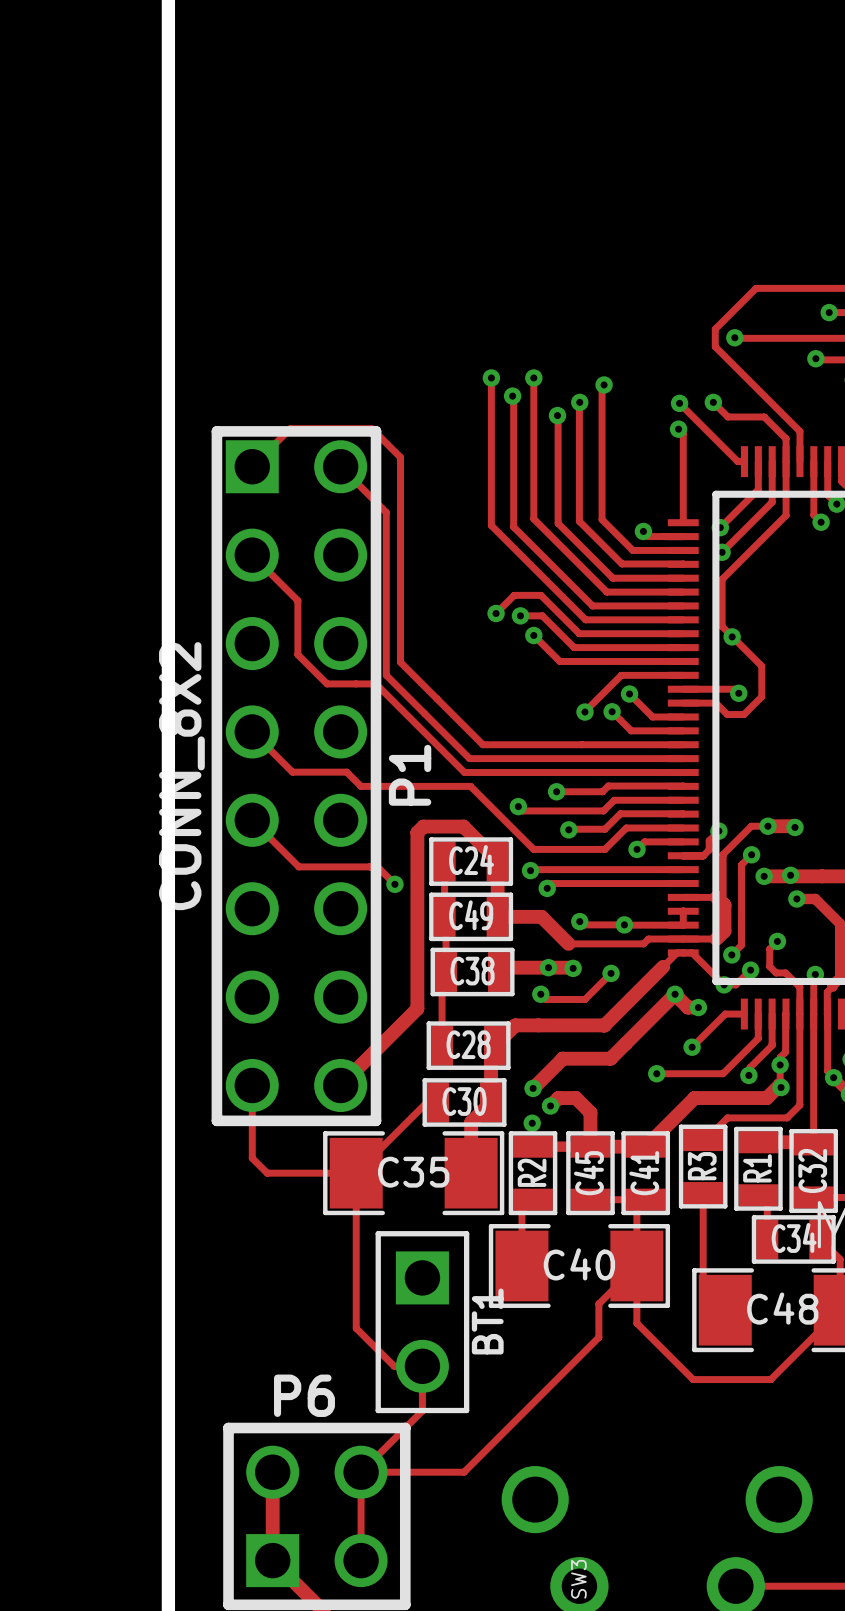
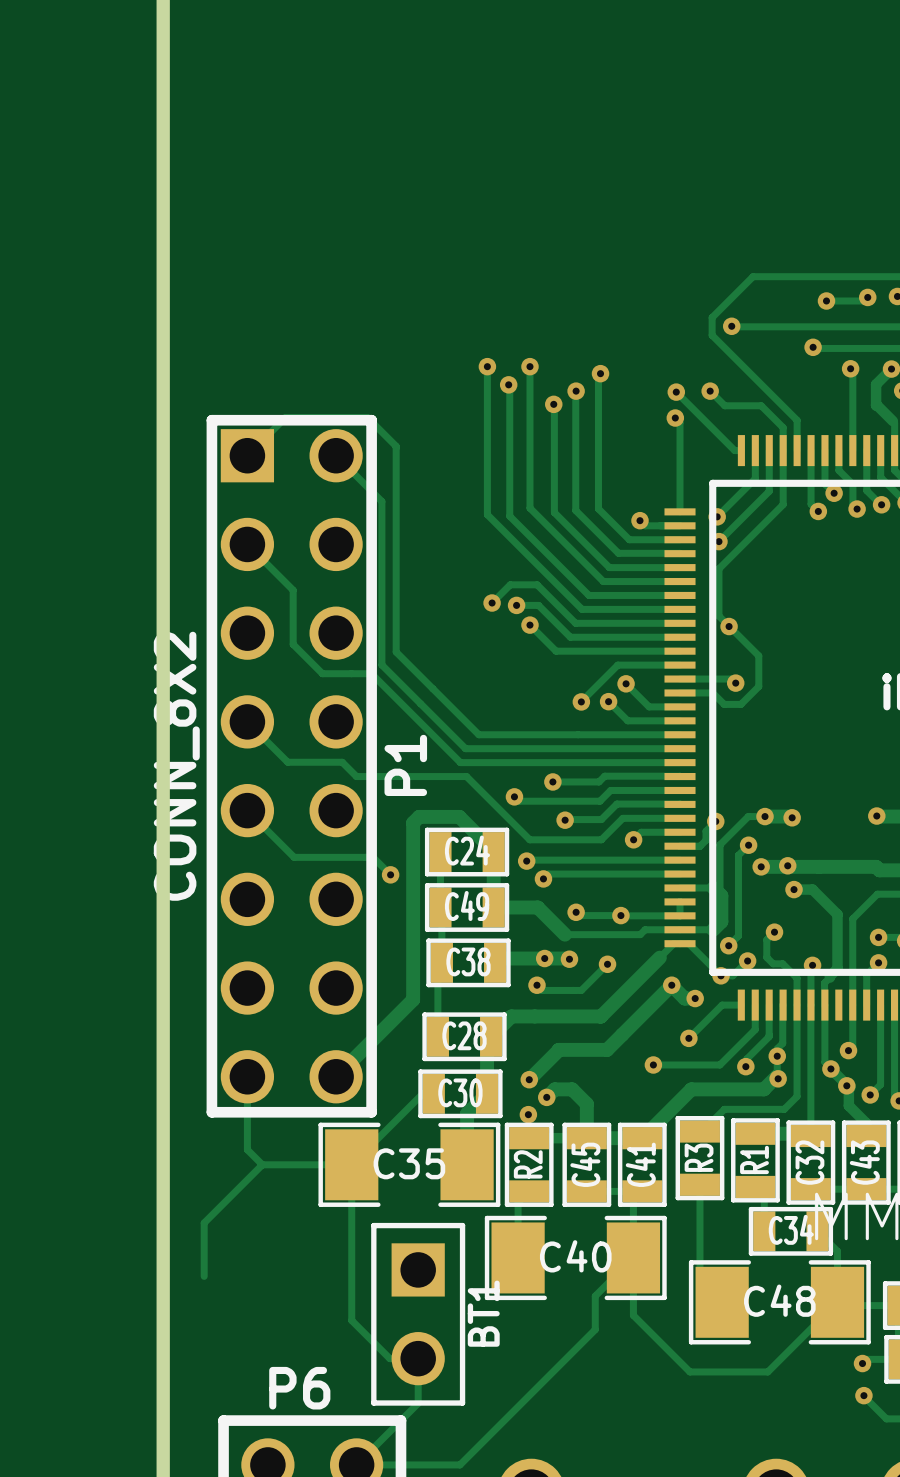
track: none -> (262, 1164) (204, 1222) (204, 1276)

